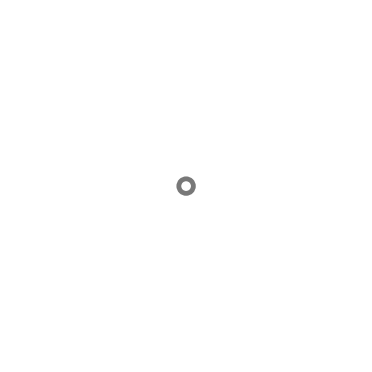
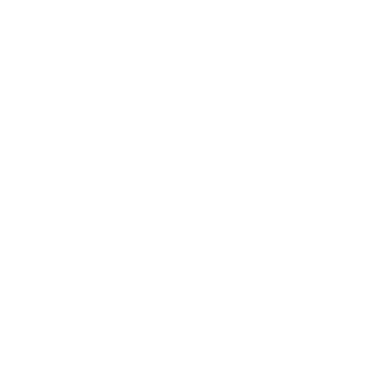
via: (186, 186) -> none

